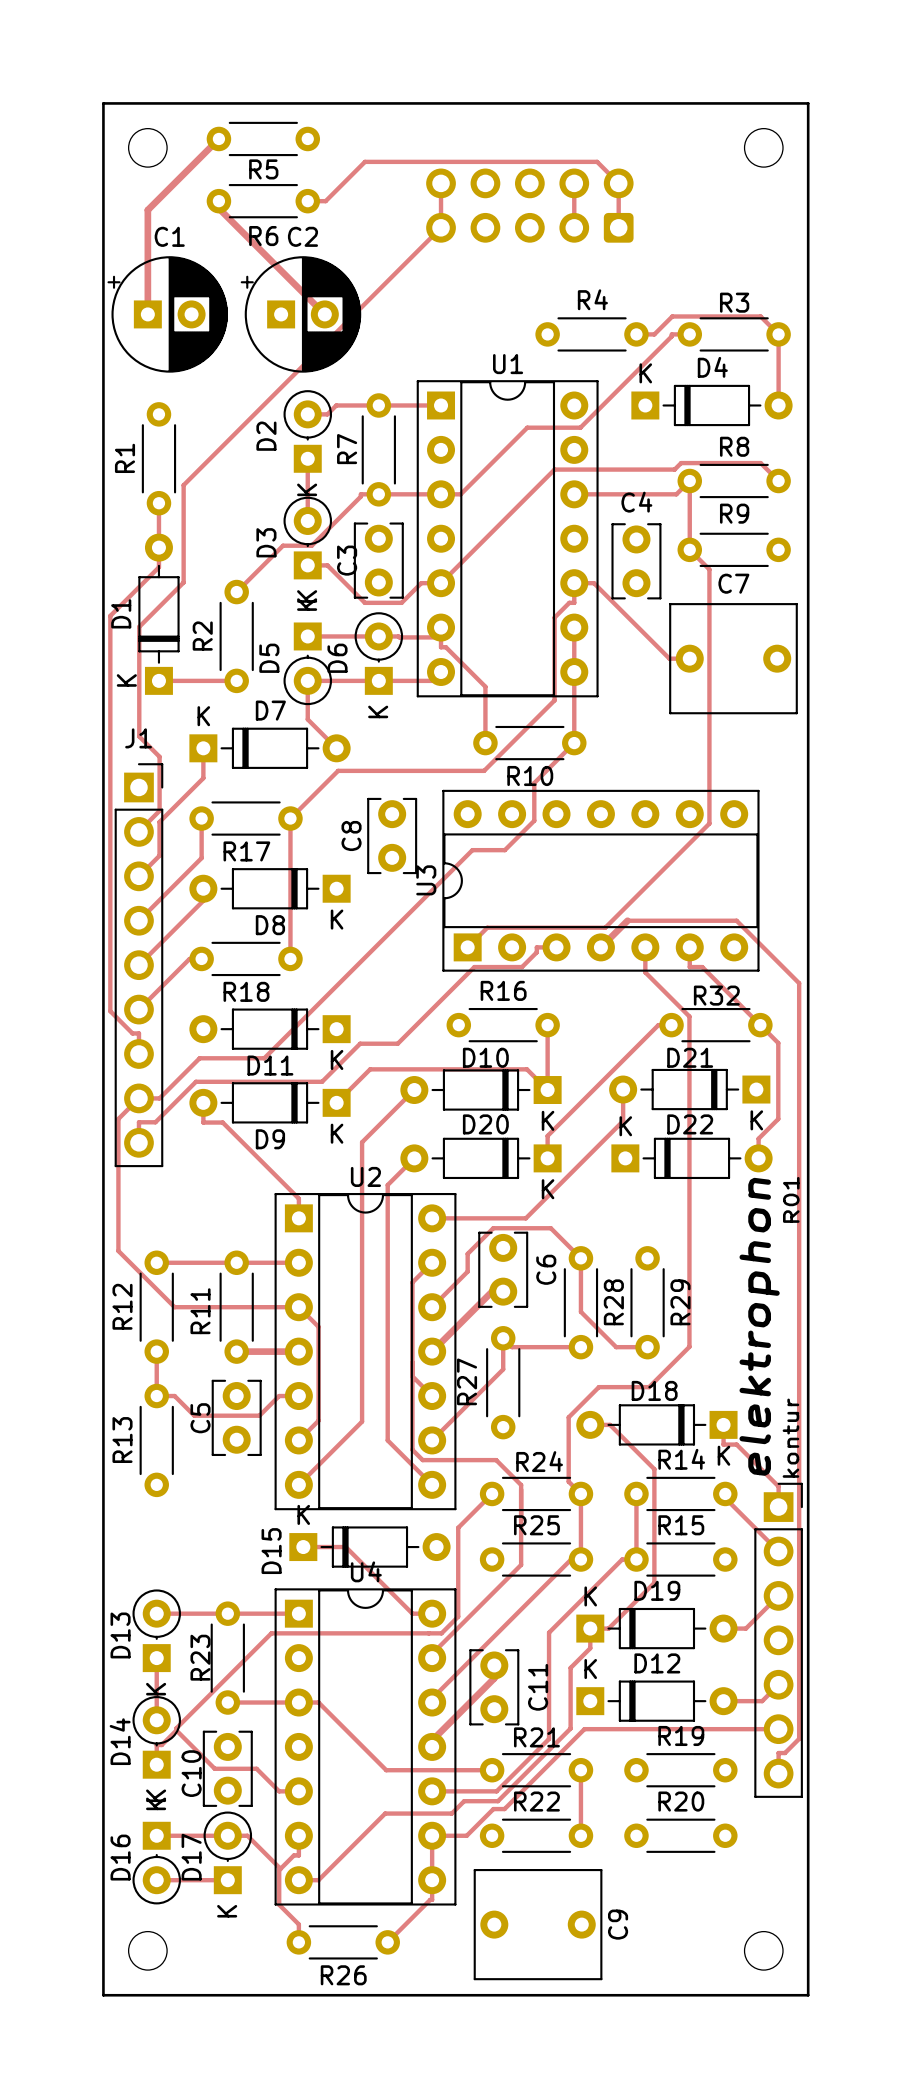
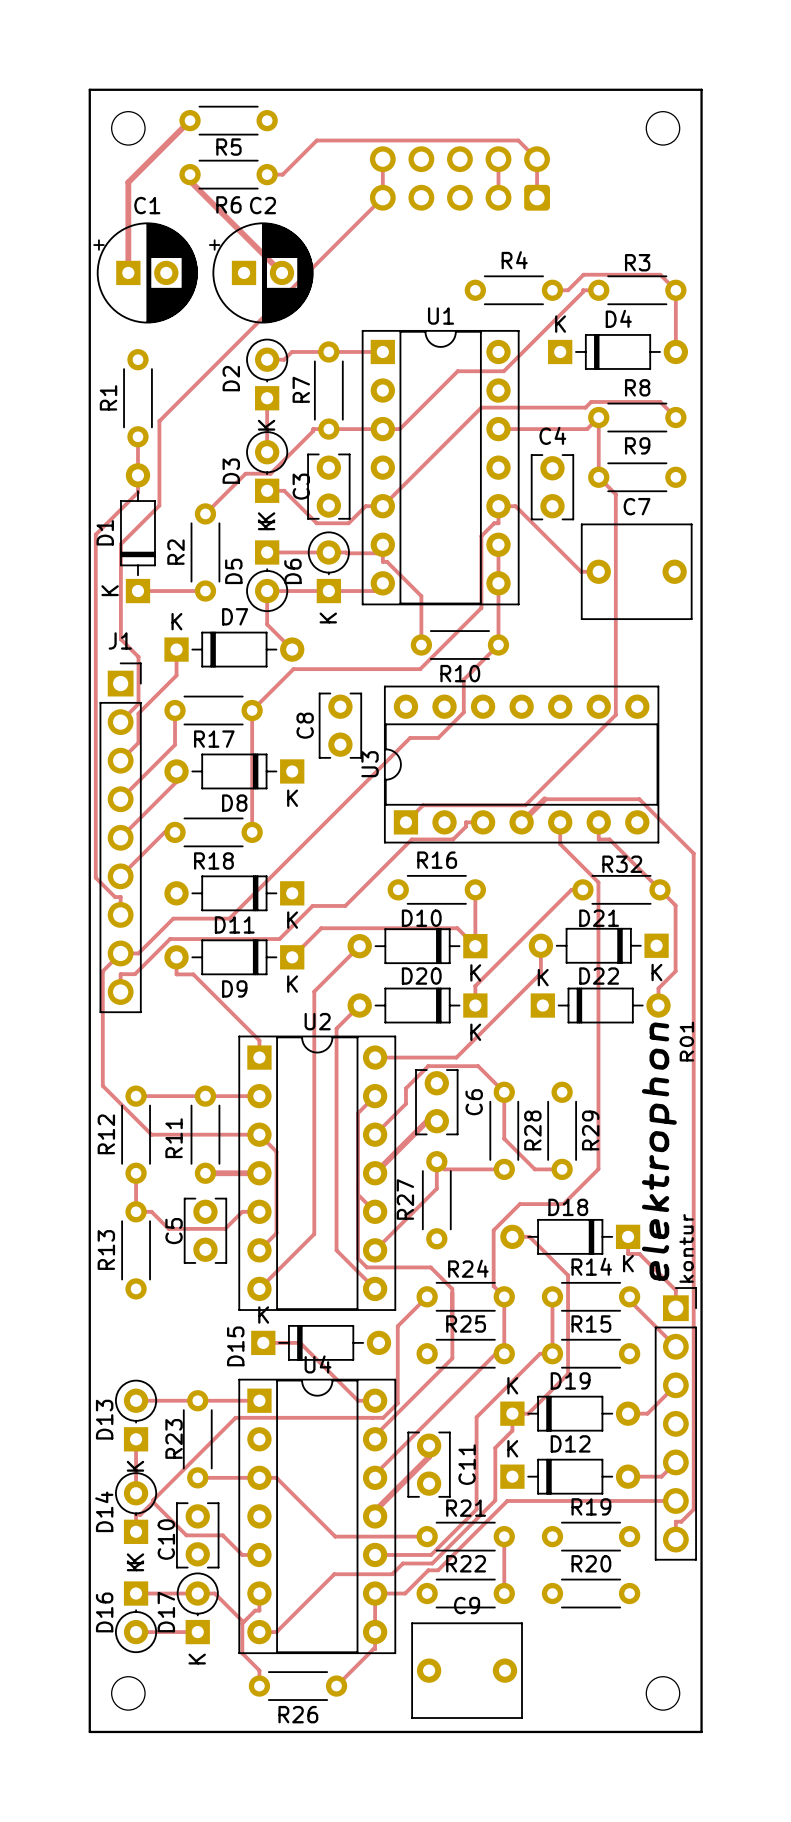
C9 name rotation: 0° (618, 1924) -> 90° clockwise (467, 1605)
C9 name position: C9 (618, 1924) -> C9 (467, 1605)

